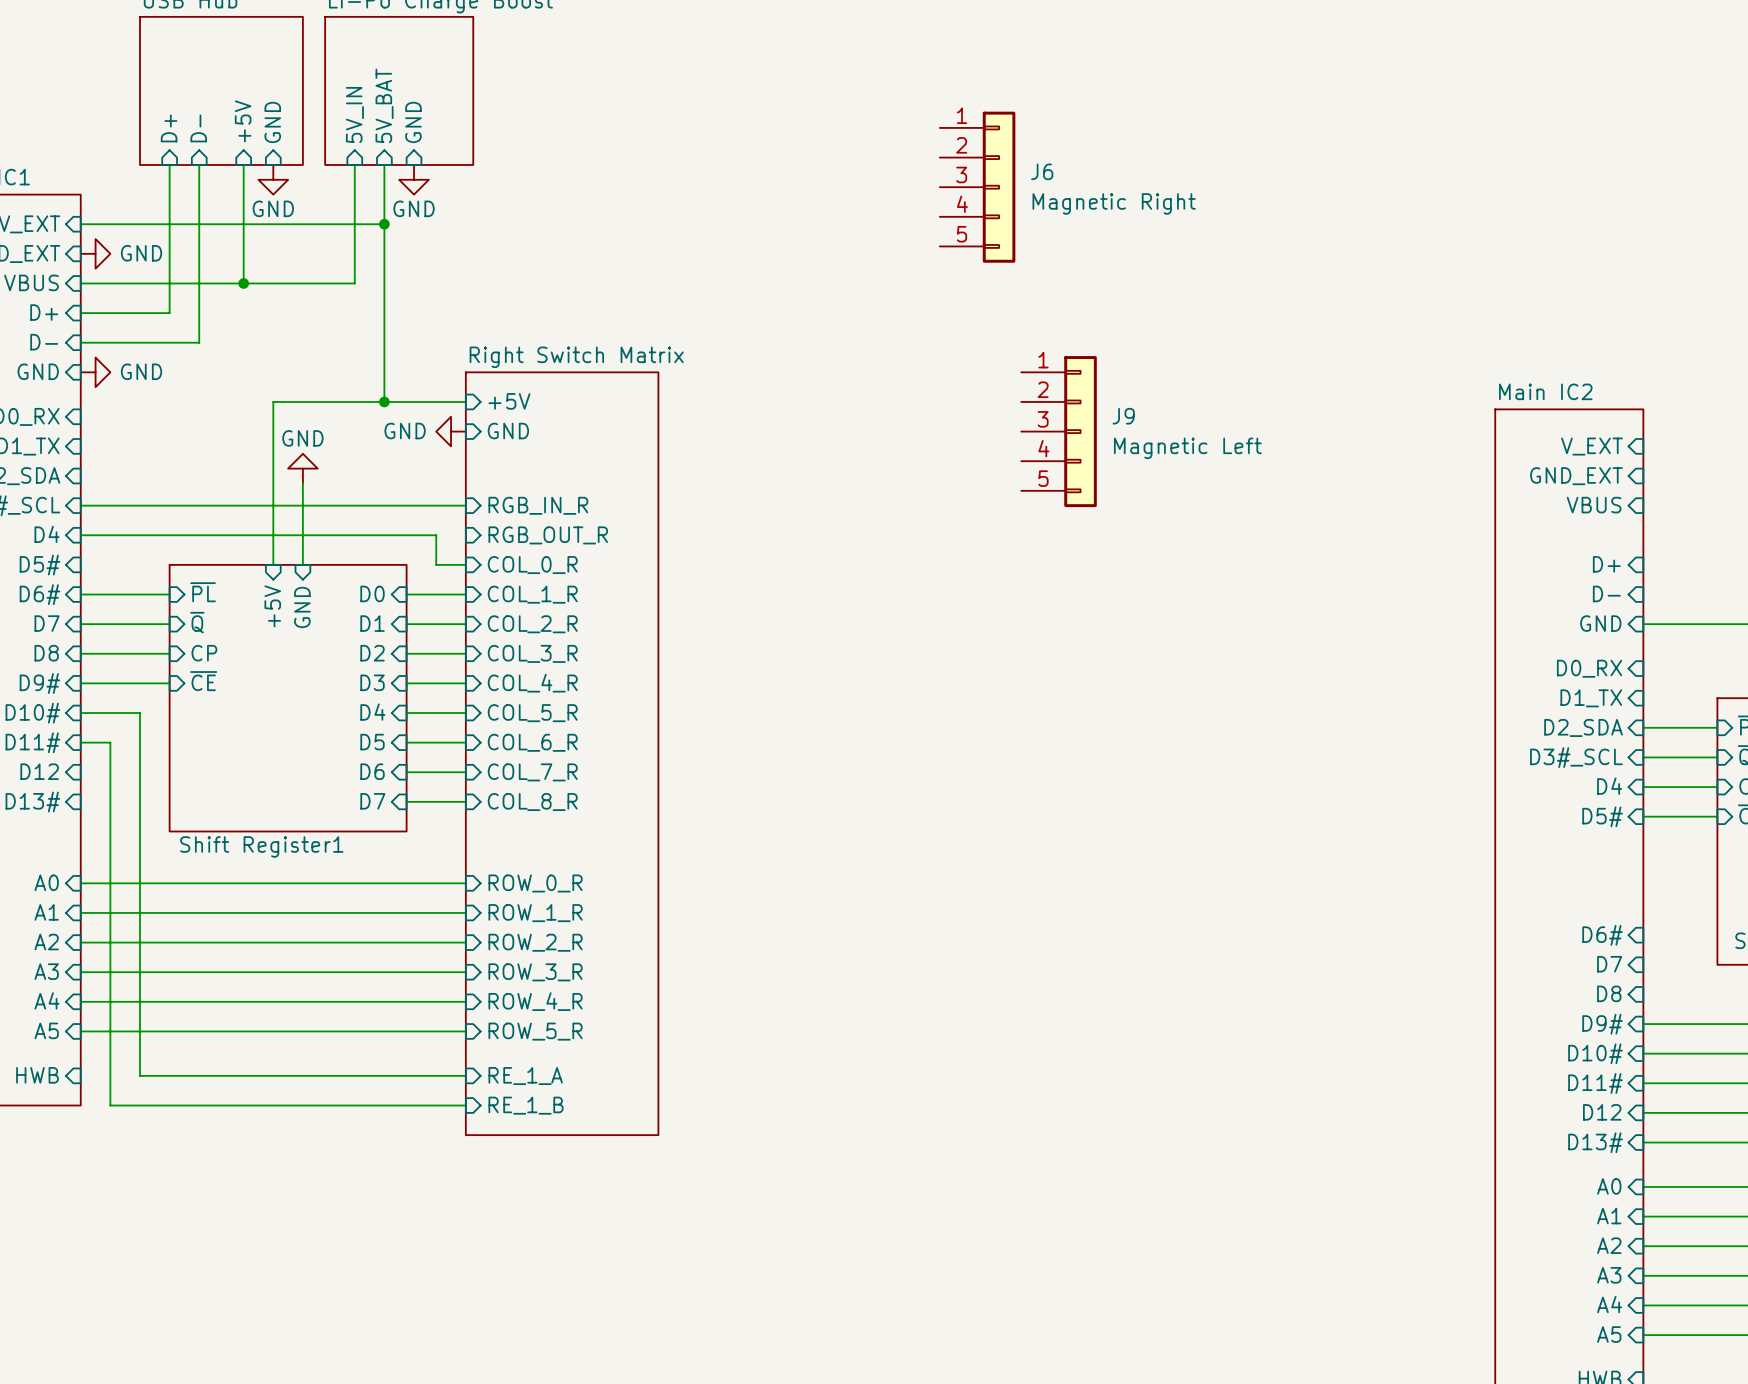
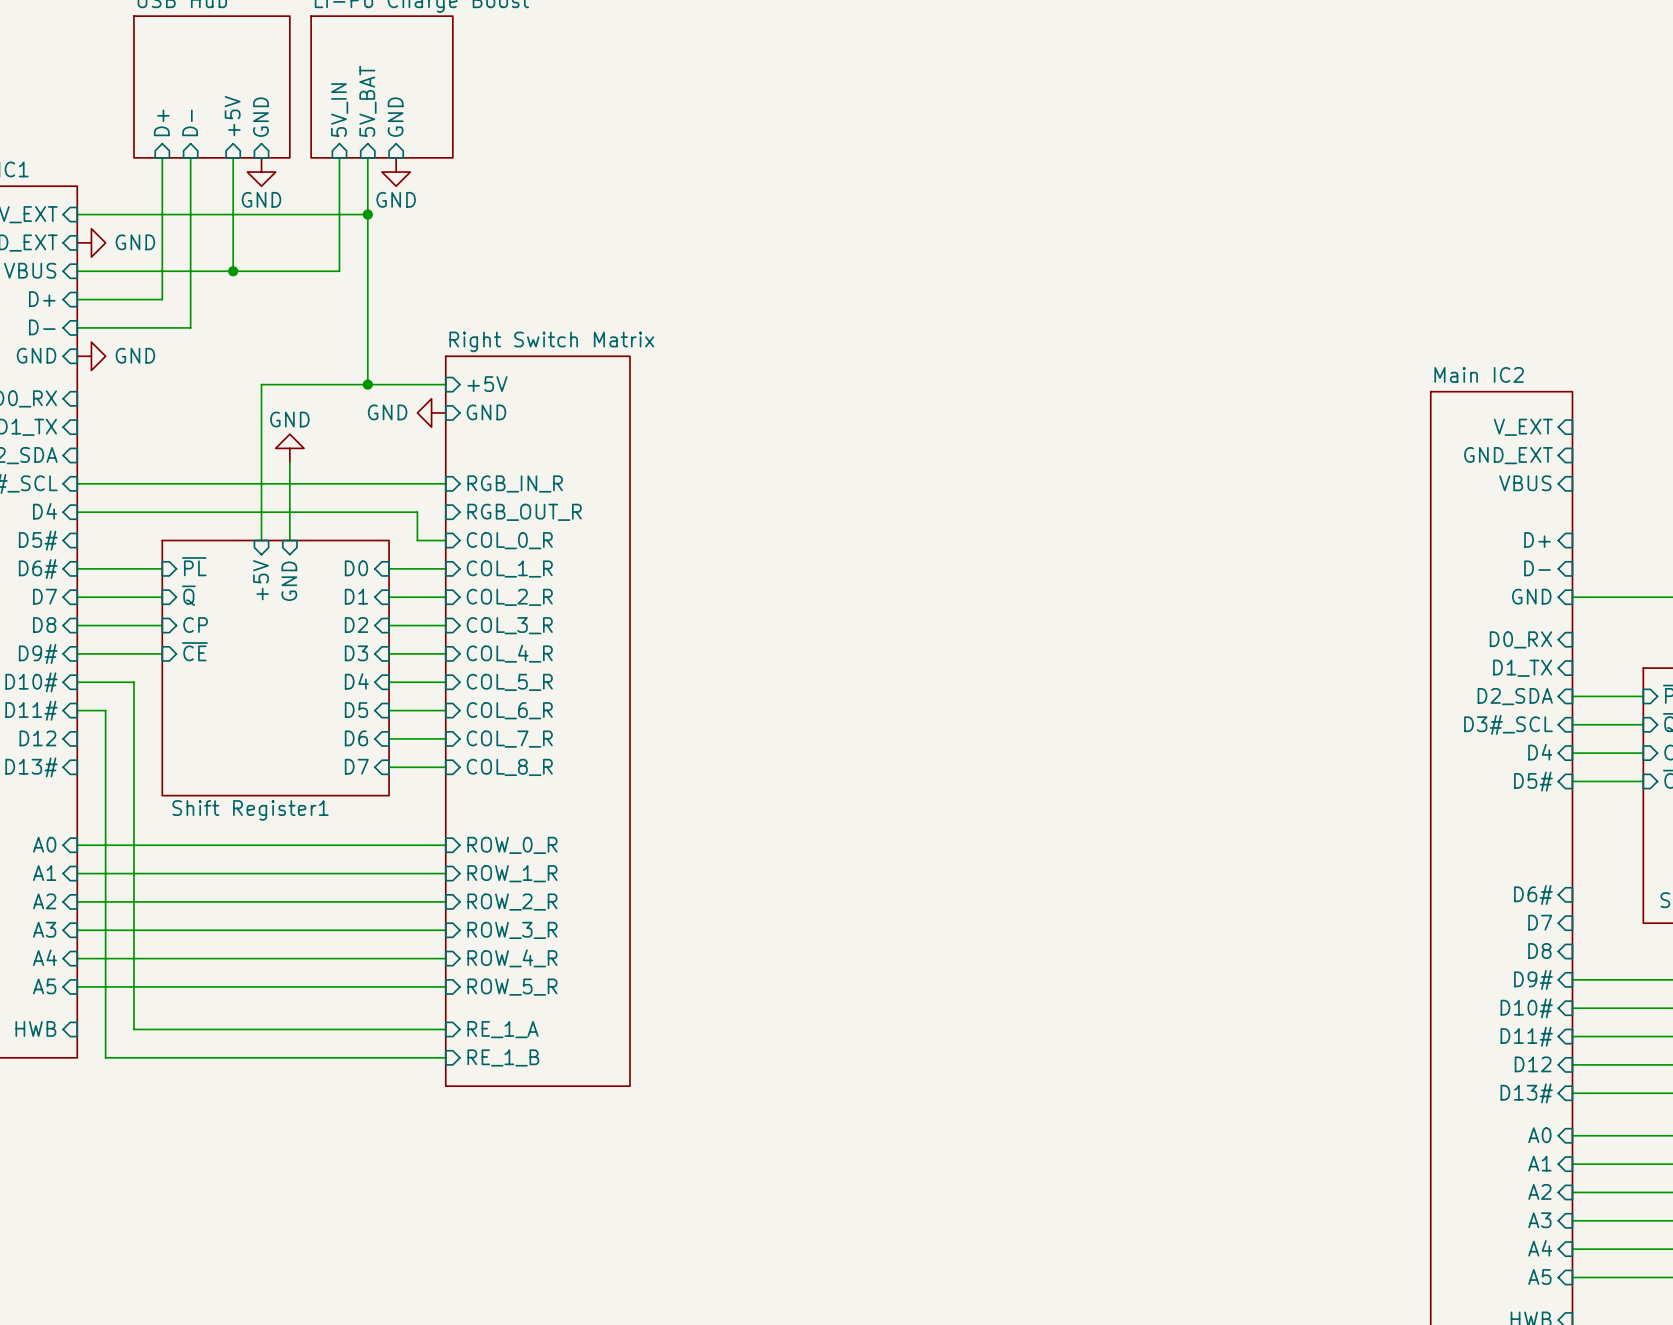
J6: Magnetic Right (977, 187) -> none
J9: Magnetic Left (1059, 431) -> none

